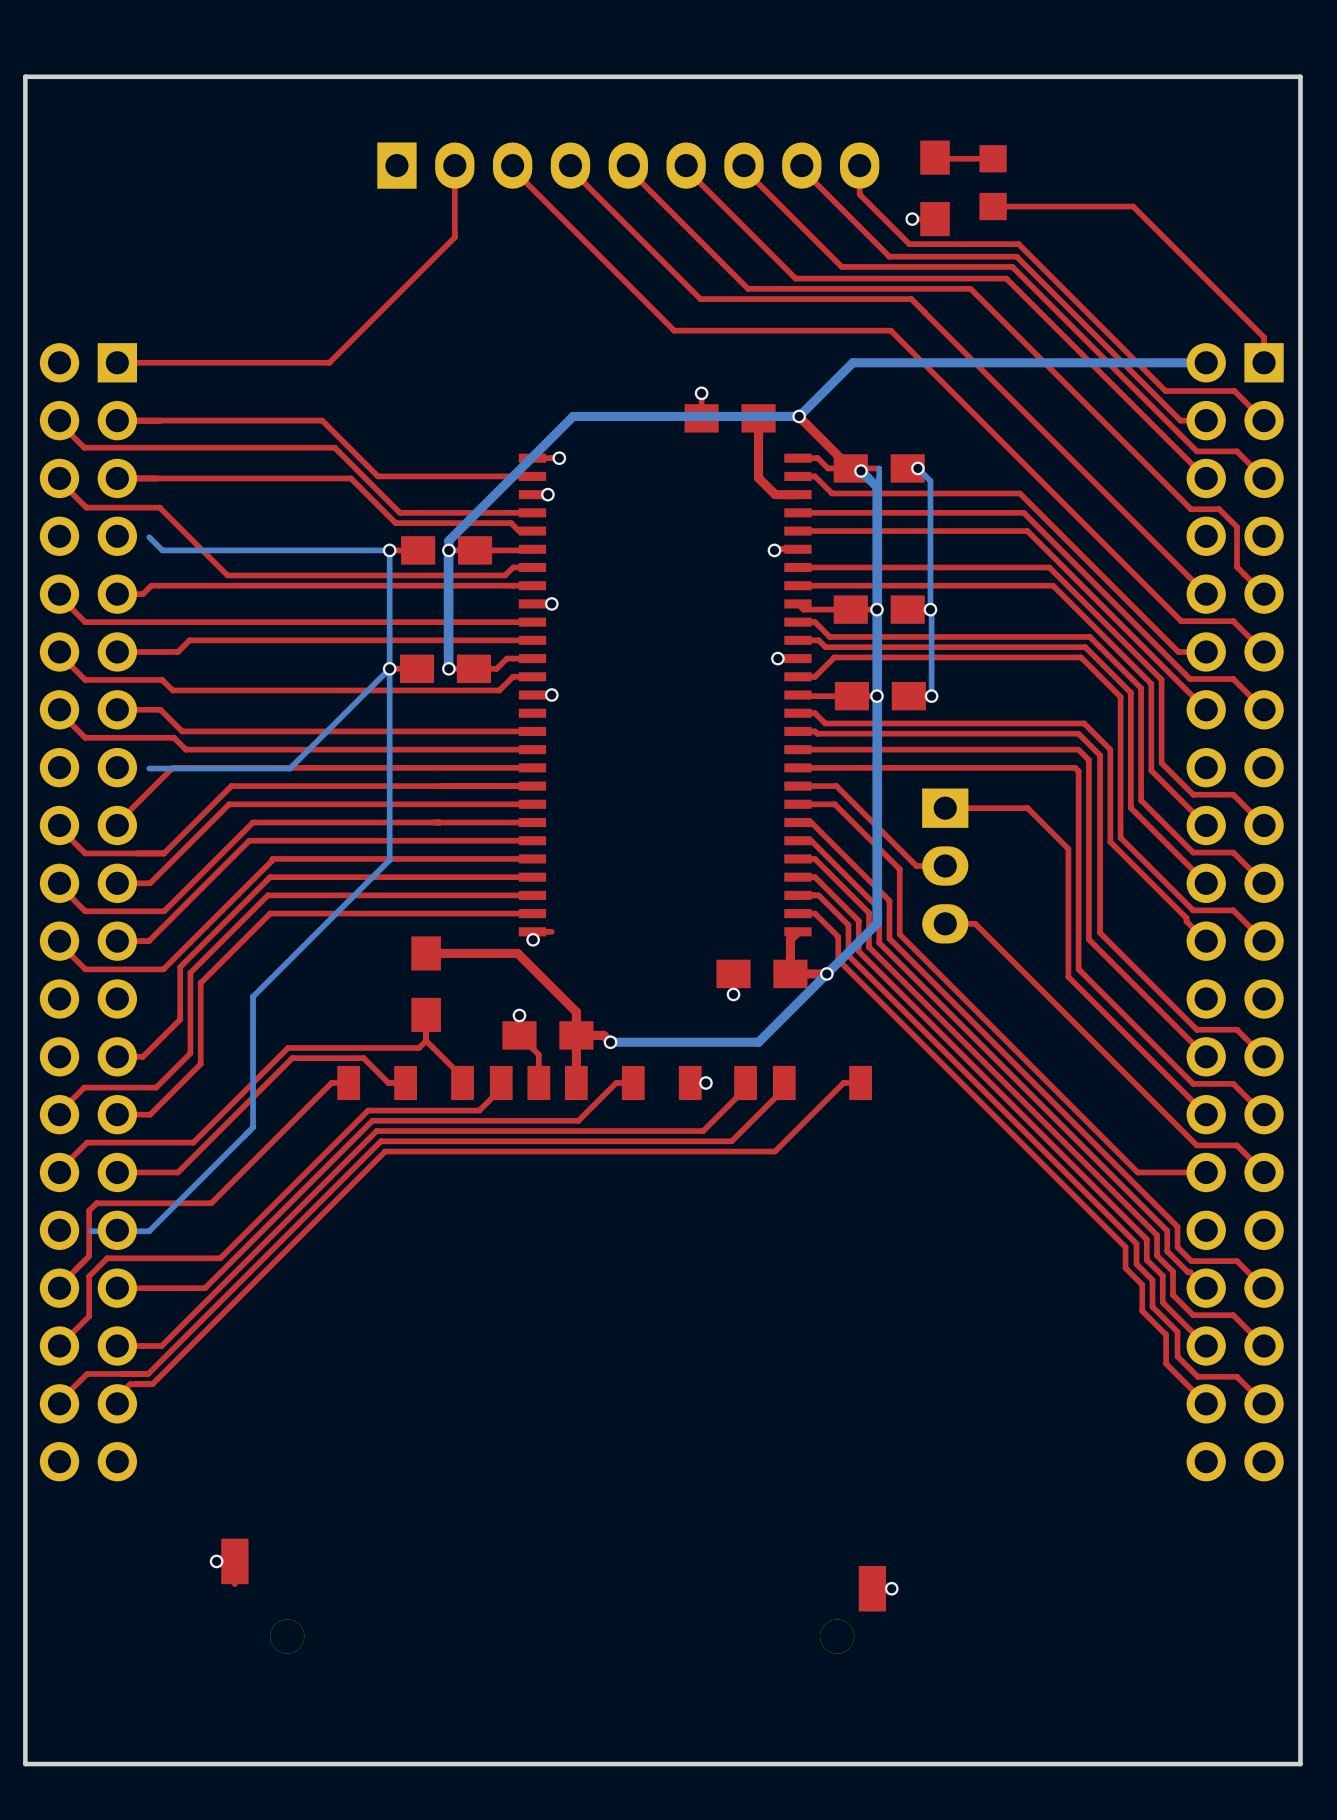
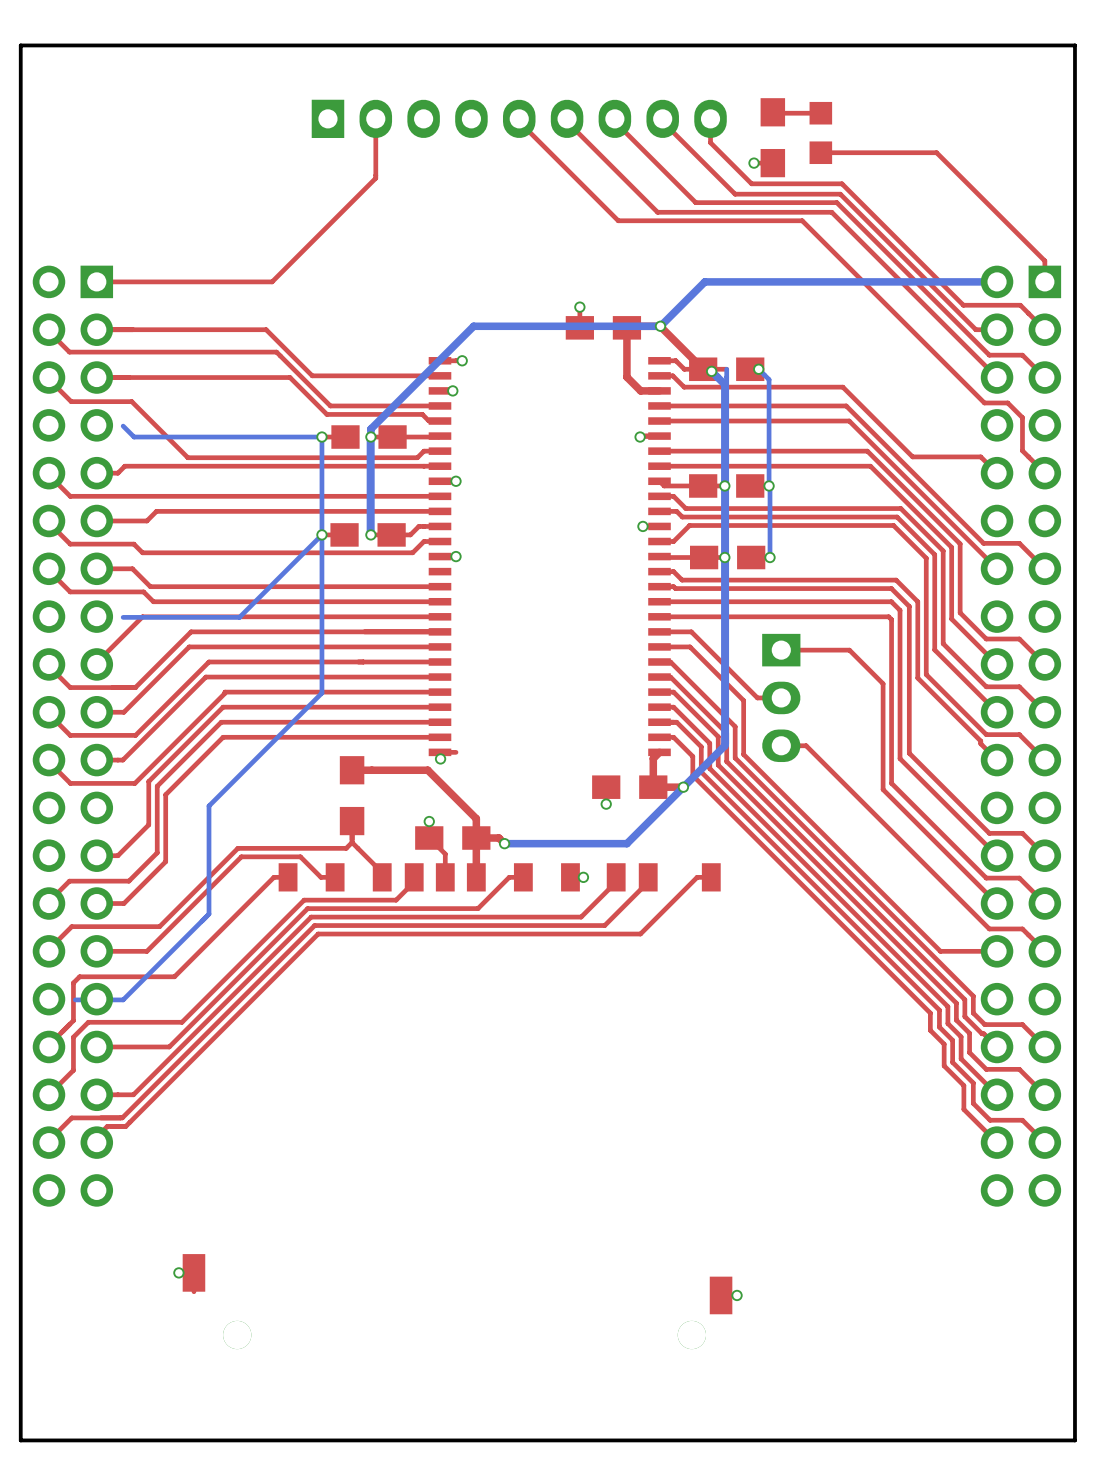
top track: (512, 165) (512, 169) (674, 330) (890, 330) (1181, 621) (1233, 621) (1264, 651) -> none
top track: (570, 165) (570, 169) (700, 299) (911, 299) (1186, 574) -> none
top track: (814, 476) (832, 493) (1019, 493) (1178, 651) (1206, 651) -> (672, 375) (684, 387) (842, 387) (912, 456) (980, 456)

